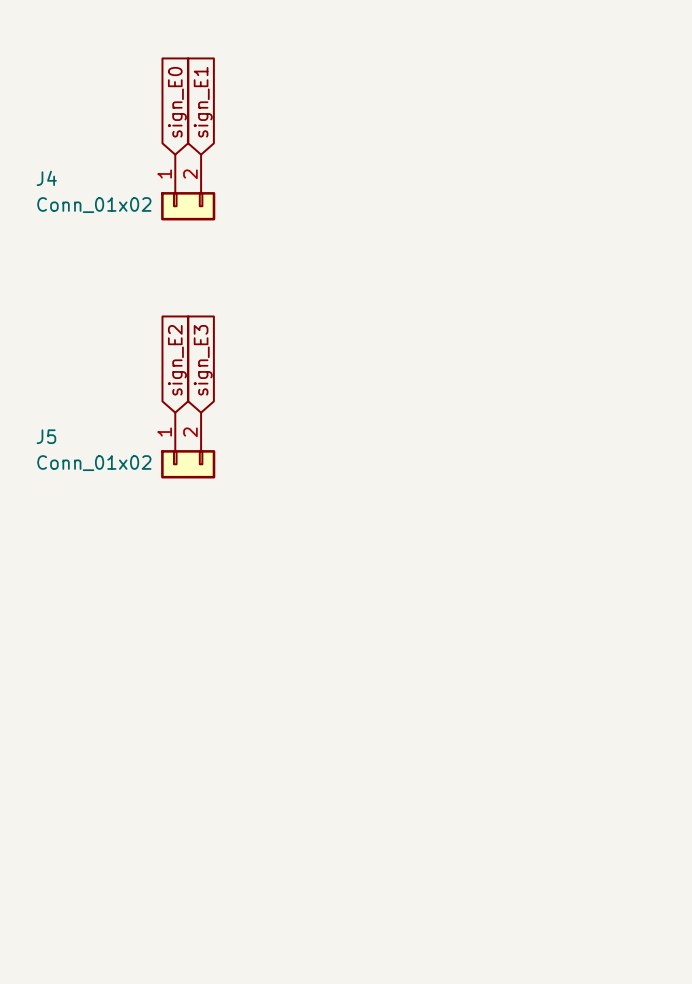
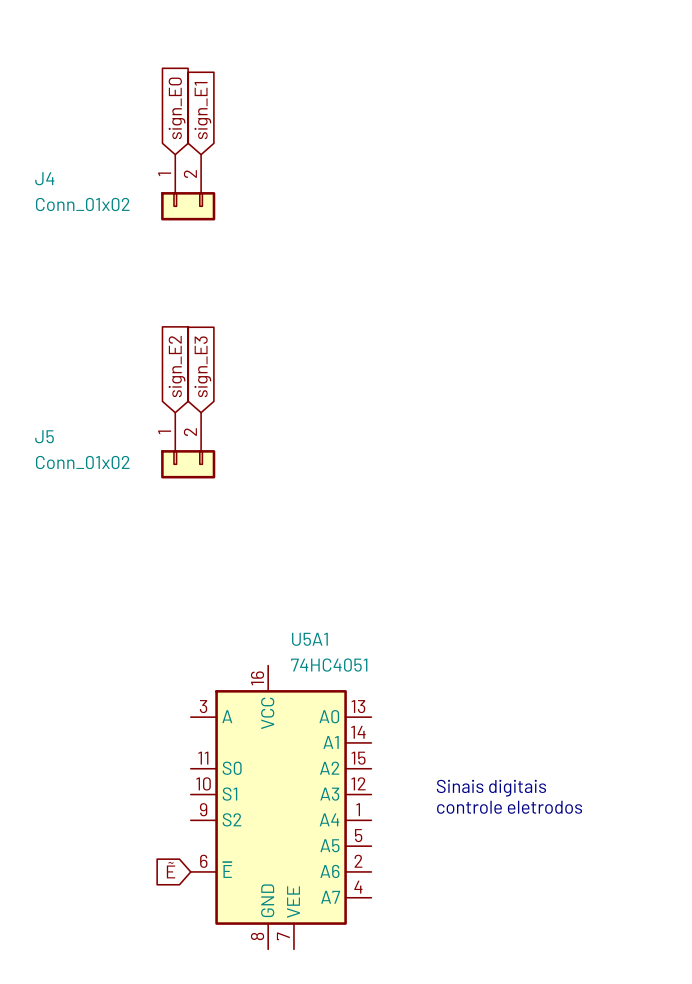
text: none -> Sinais digitais (491, 788)
U5A1: none -> 74HC4051 (281, 807)
text: none -> controle eletrodos (509, 807)
global label: none -> Ẽ (171, 870)

